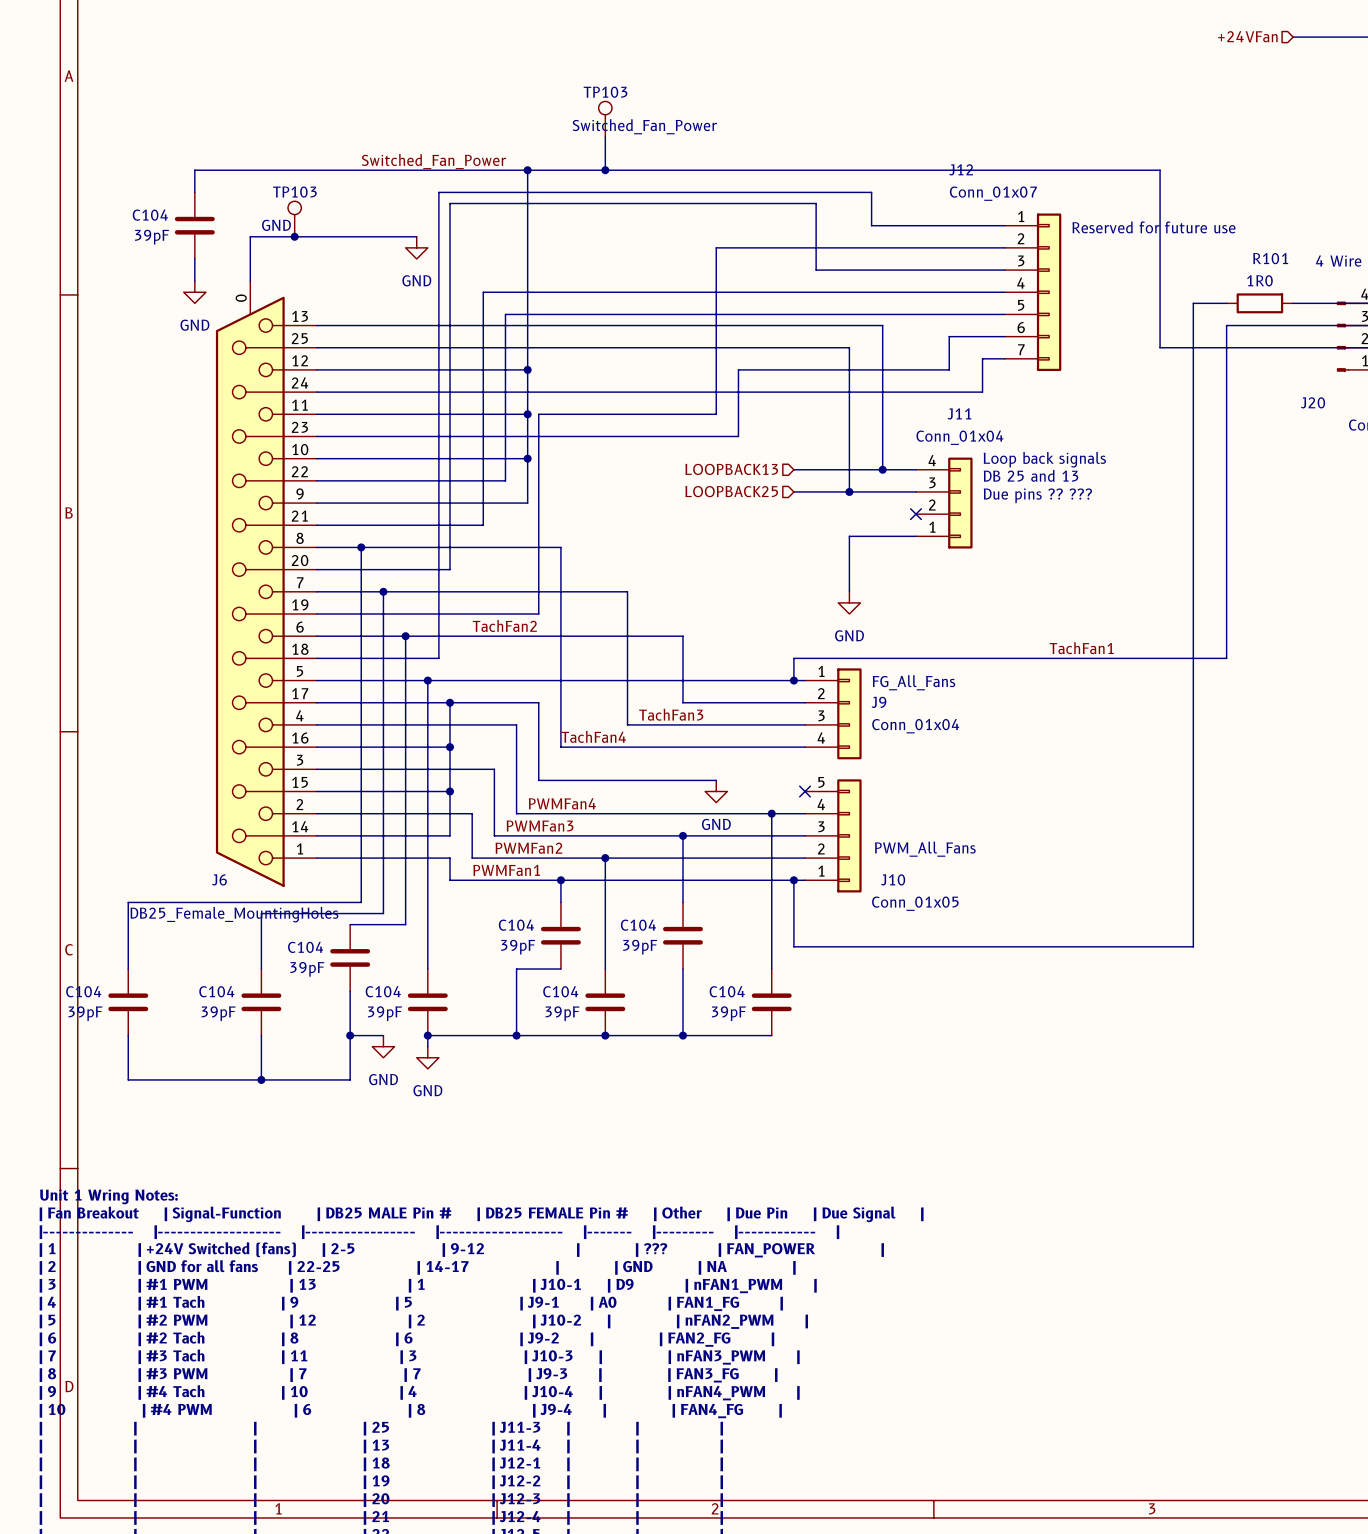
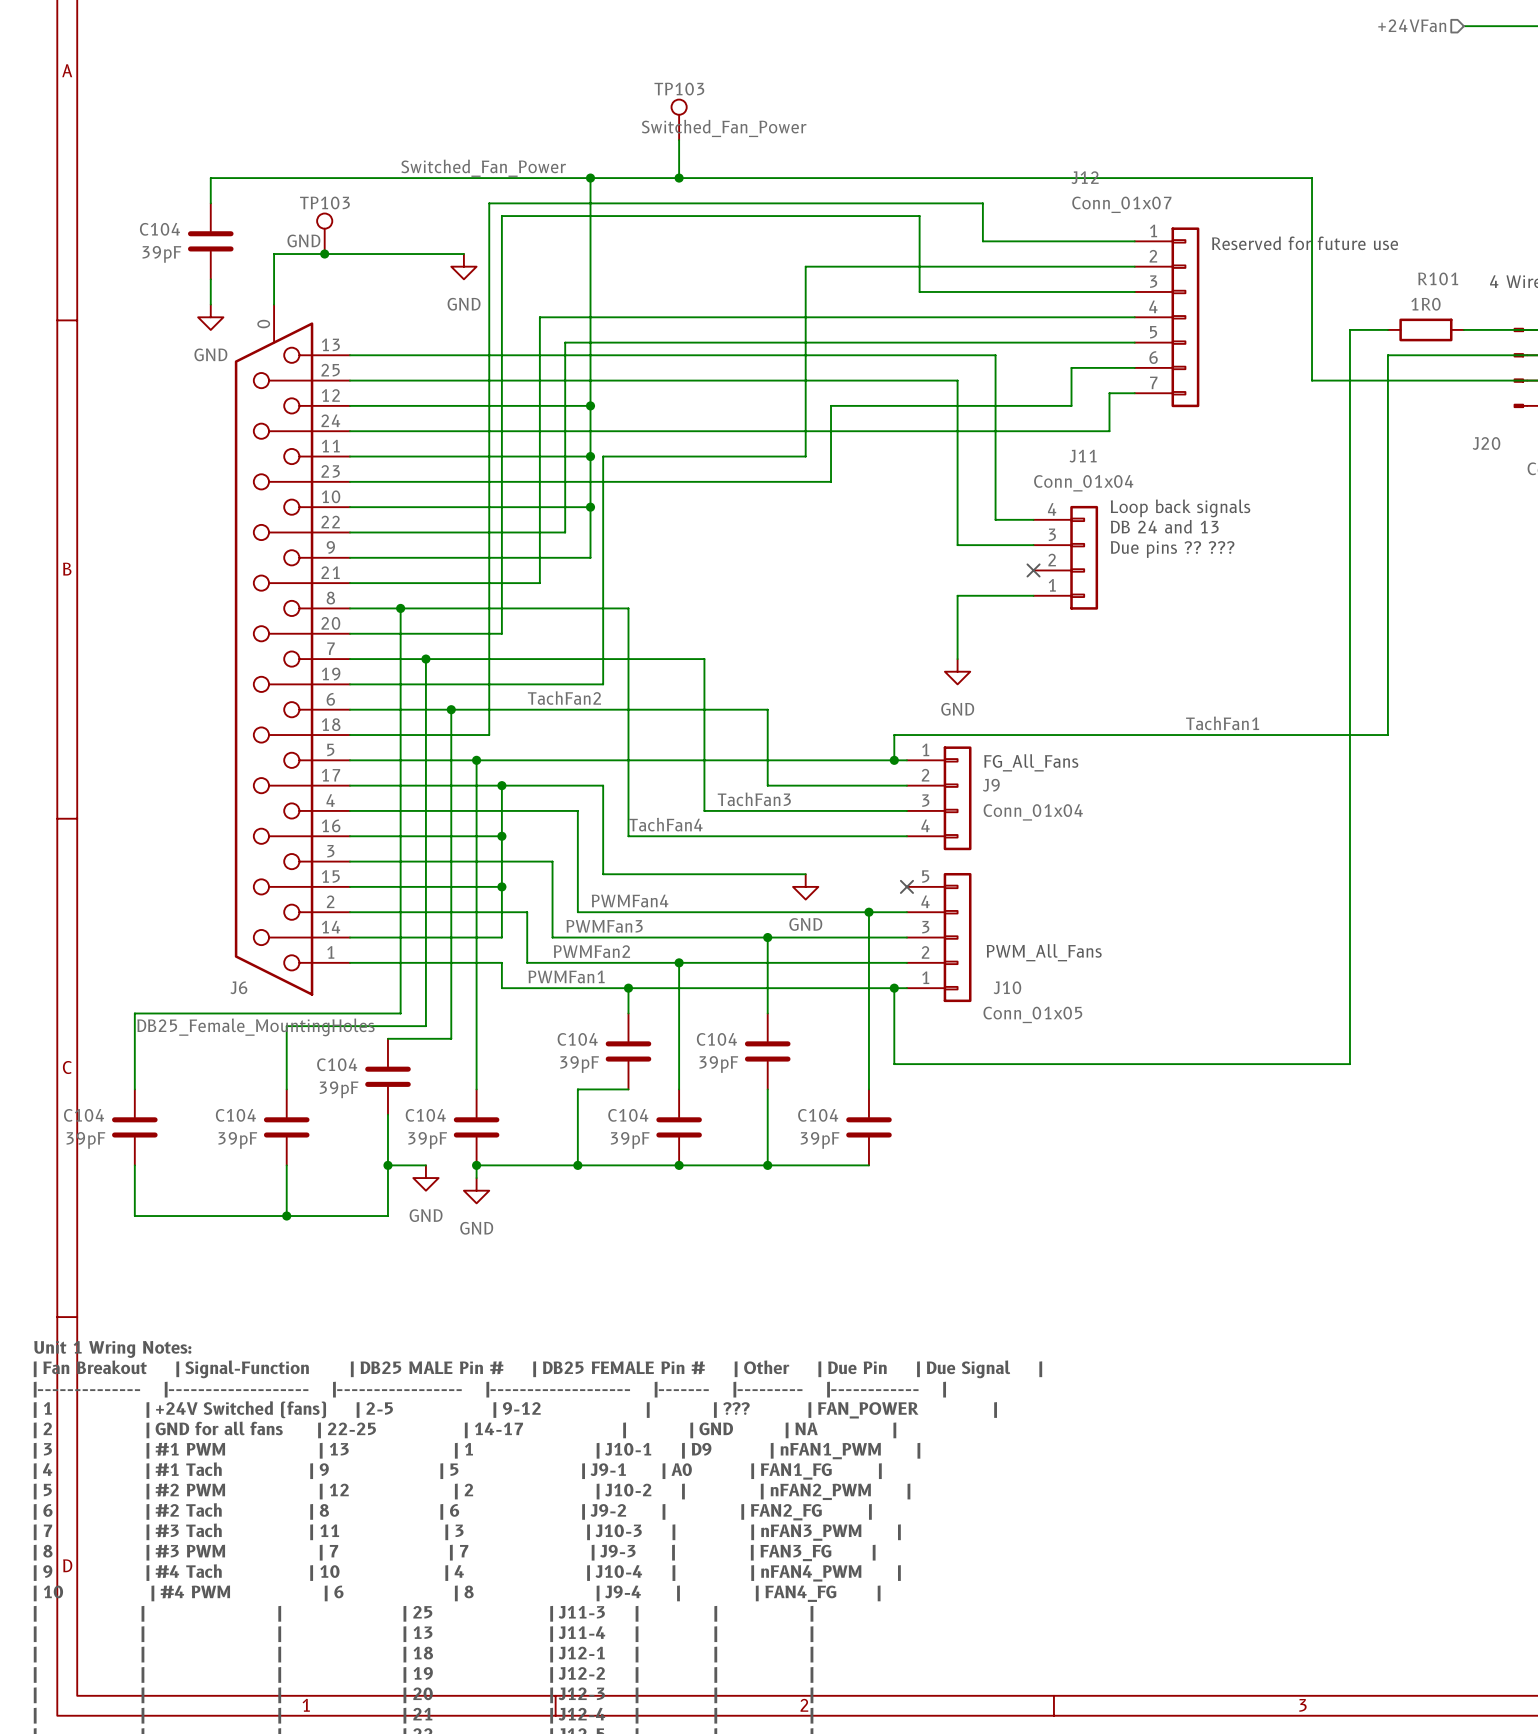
hierarchical label: LOOPBACK13 (731, 469) -> none
wire: (793, 469) (882, 469) -> none
junction: (882, 469) -> none
text: DB 25 and 13 (1030, 475) -> DB 24 and 13 (1164, 526)
hierarchical label: LOOPBACK25 (731, 491) -> none
wire: (793, 491) (849, 491) -> none
junction: (849, 491) -> none

